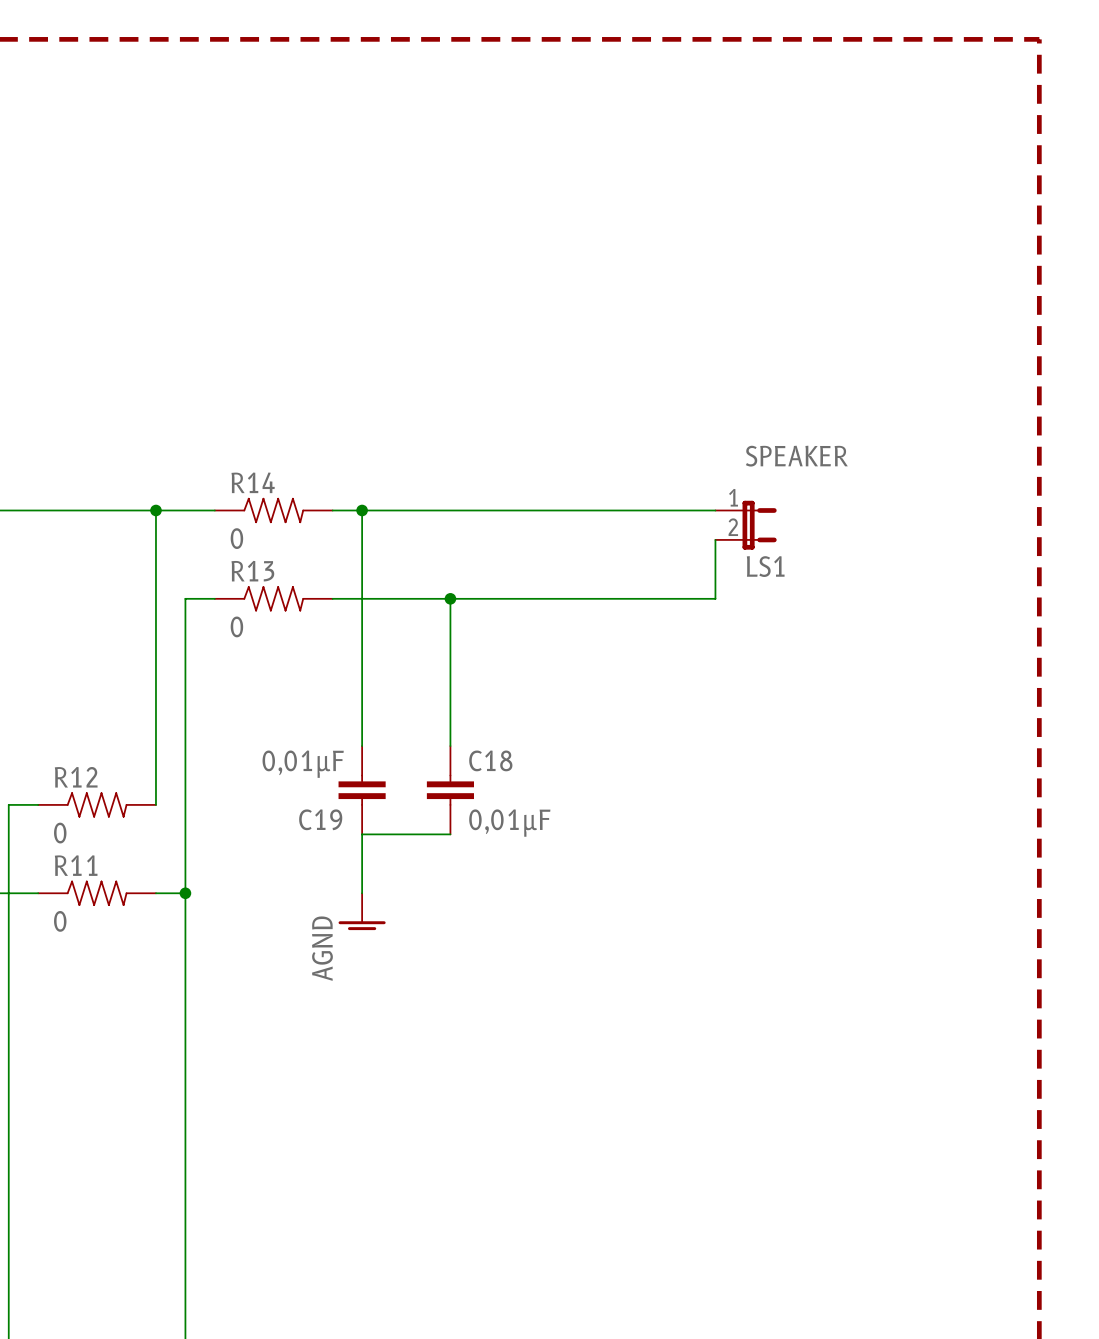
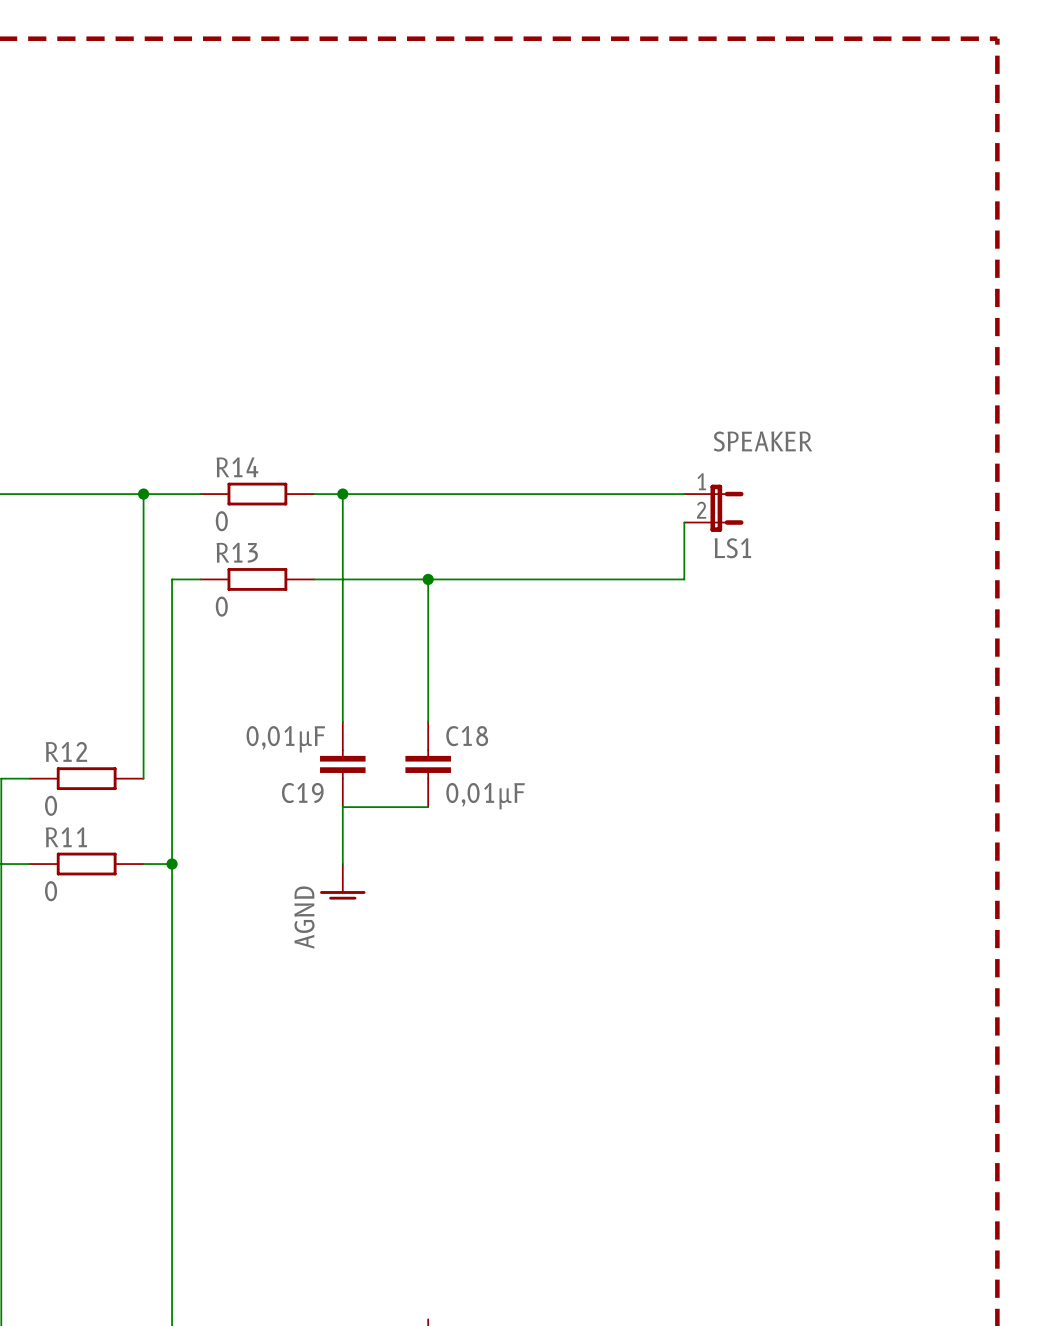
R14 symbol: [214, 497, 333, 524] -> [200, 482, 315, 506]
R13 symbol: [214, 586, 333, 612] -> [200, 568, 315, 591]
R12 symbol: [38, 792, 156, 818] -> [29, 767, 144, 791]
R11 symbol: [38, 880, 156, 906] -> [29, 852, 144, 876]

